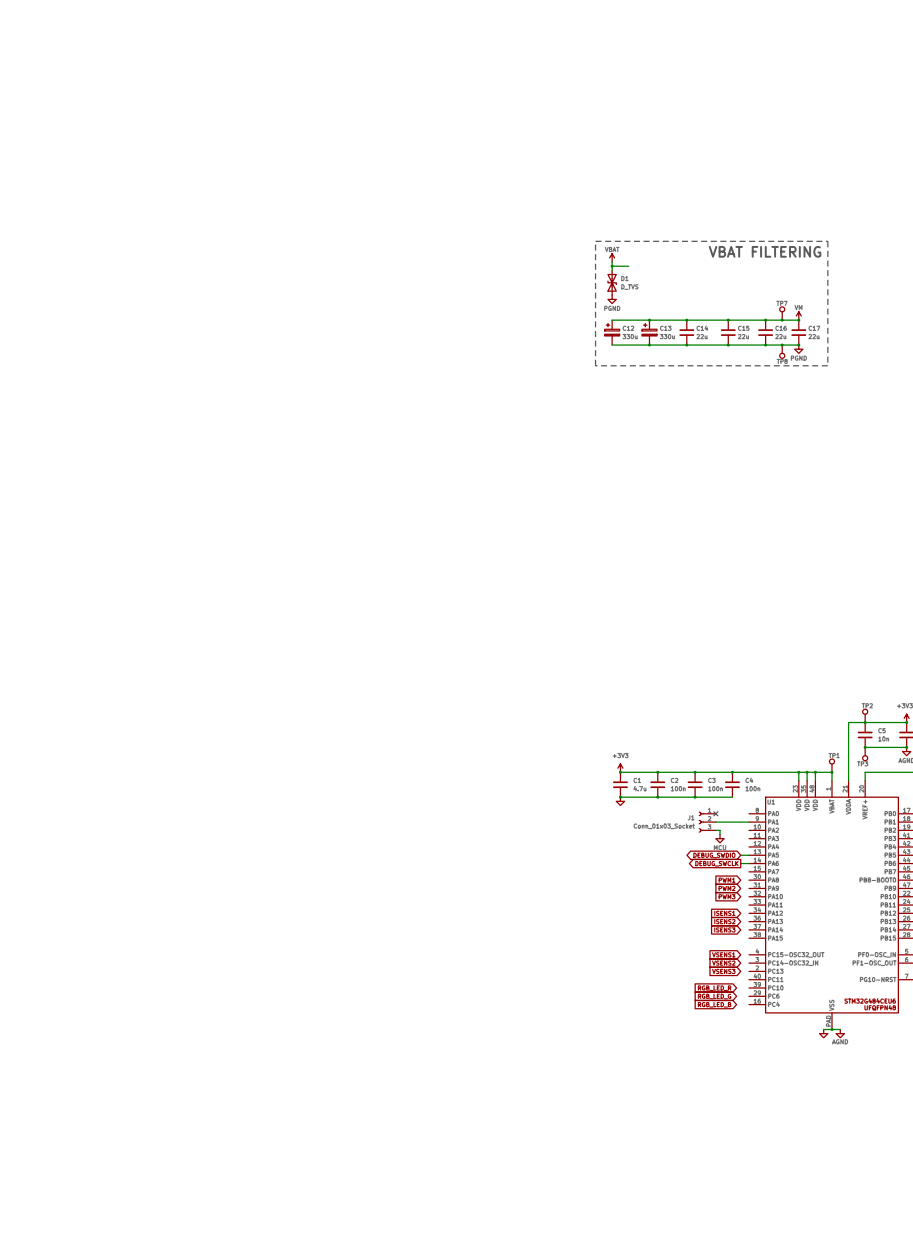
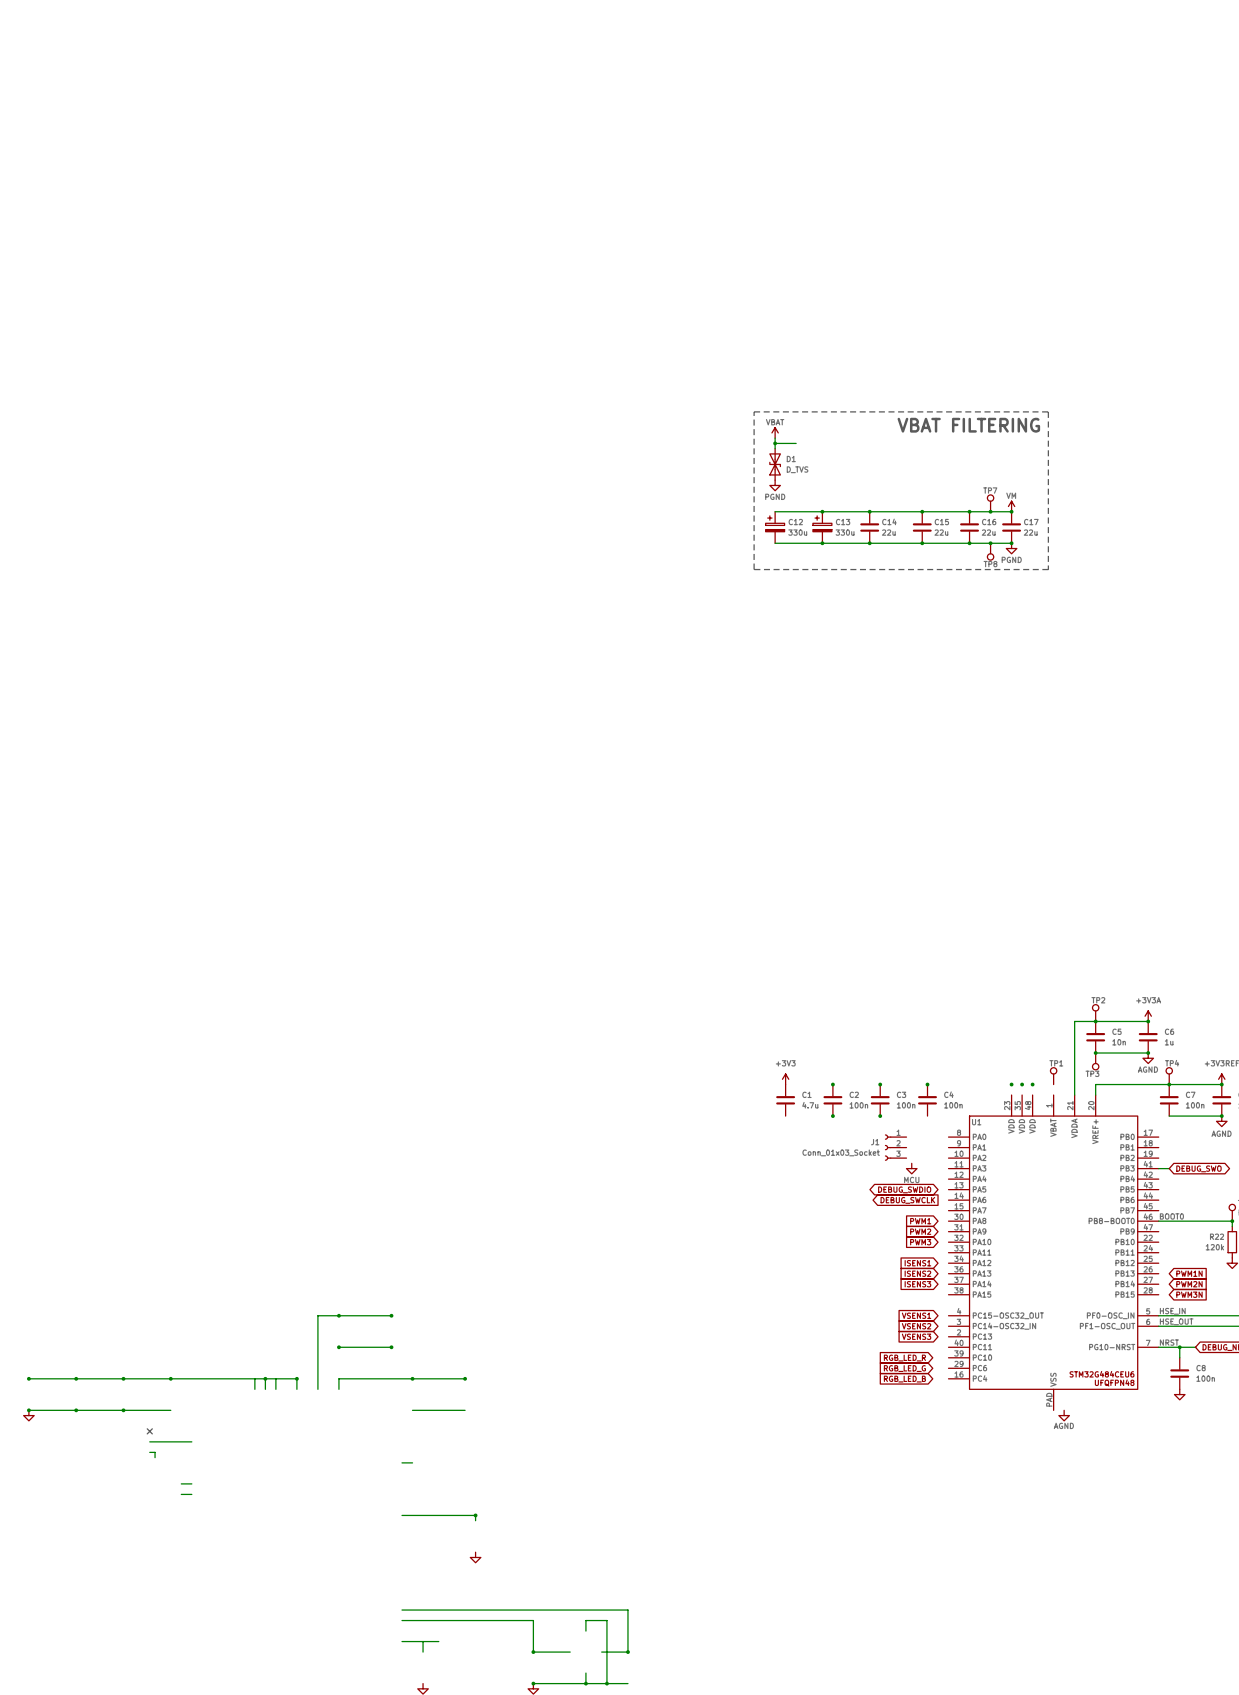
wire: (620, 772) (831, 772) (831, 780) -> none
junction: (620, 772) -> none
wire: (798, 772) (798, 780) -> none
wire: (807, 772) (807, 780) -> none
wire: (815, 772) (815, 780) -> none
junction: (831, 772) -> none
wire: (620, 797) (732, 797) -> none
junction: (620, 797) -> none
power symbol: (620, 801) -> none
no-connect mark: (715, 813) -> none
wire: (715, 822) (749, 822) -> none
wire: (715, 830) (719, 830) (719, 834) -> none
wire: (740, 855) (749, 855) -> none
wire: (740, 863) (749, 863) -> none
junction: none -> (338, 1315)
wire: none -> (391, 1315) (317, 1315) (317, 1389)
junction: none -> (391, 1315)
wire: none -> (338, 1347) (391, 1347)
junction: none -> (338, 1347)
junction: none -> (391, 1347)
wire: none -> (28, 1378) (296, 1378) (296, 1389)
junction: none -> (28, 1378)
junction: none -> (76, 1378)
junction: none -> (123, 1378)
junction: none -> (170, 1378)
wire: none -> (254, 1378) (254, 1389)
wire: none -> (265, 1378) (265, 1389)
junction: none -> (265, 1378)
wire: none -> (275, 1378) (275, 1389)
junction: none -> (296, 1378)
junction: none -> (412, 1378)
wire: none -> (465, 1378) (338, 1378) (338, 1389)
junction: none -> (465, 1378)
wire: none -> (28, 1410) (170, 1410)
junction: none -> (28, 1410)
junction: none -> (76, 1410)
junction: none -> (123, 1410)
wire: none -> (412, 1410) (465, 1410)
wire: (823, 1029) (840, 1029) -> none
junction: (831, 1029) -> none
power symbol: none -> (28, 1415)
power symbol: (823, 1033) -> none
no-connect mark: none -> (149, 1431)
wire: none -> (149, 1441) (191, 1441)
wire: none -> (149, 1452) (155, 1452) (155, 1457)
wire: none -> (402, 1462) (412, 1462)
wire: none -> (181, 1483) (191, 1483)
wire: none -> (181, 1494) (191, 1494)
wire: none -> (402, 1515) (475, 1515) (475, 1520)
junction: none -> (475, 1515)
power symbol: none -> (475, 1557)
wire: none -> (402, 1610) (627, 1610) (627, 1652) (601, 1652)
wire: none -> (402, 1620) (533, 1620) (533, 1652) (570, 1652)
wire: none -> (585, 1631) (585, 1620) (606, 1620) (606, 1683)
wire: none -> (402, 1641) (438, 1641)
wire: none -> (423, 1641) (423, 1652)
junction: none -> (533, 1652)
junction: none -> (627, 1652)
wire: none -> (585, 1673) (585, 1683)
wire: none -> (533, 1683) (627, 1683)
junction: none -> (533, 1683)
junction: none -> (585, 1683)
junction: none -> (606, 1683)
power symbol: none -> (423, 1688)
power symbol: none -> (533, 1688)

